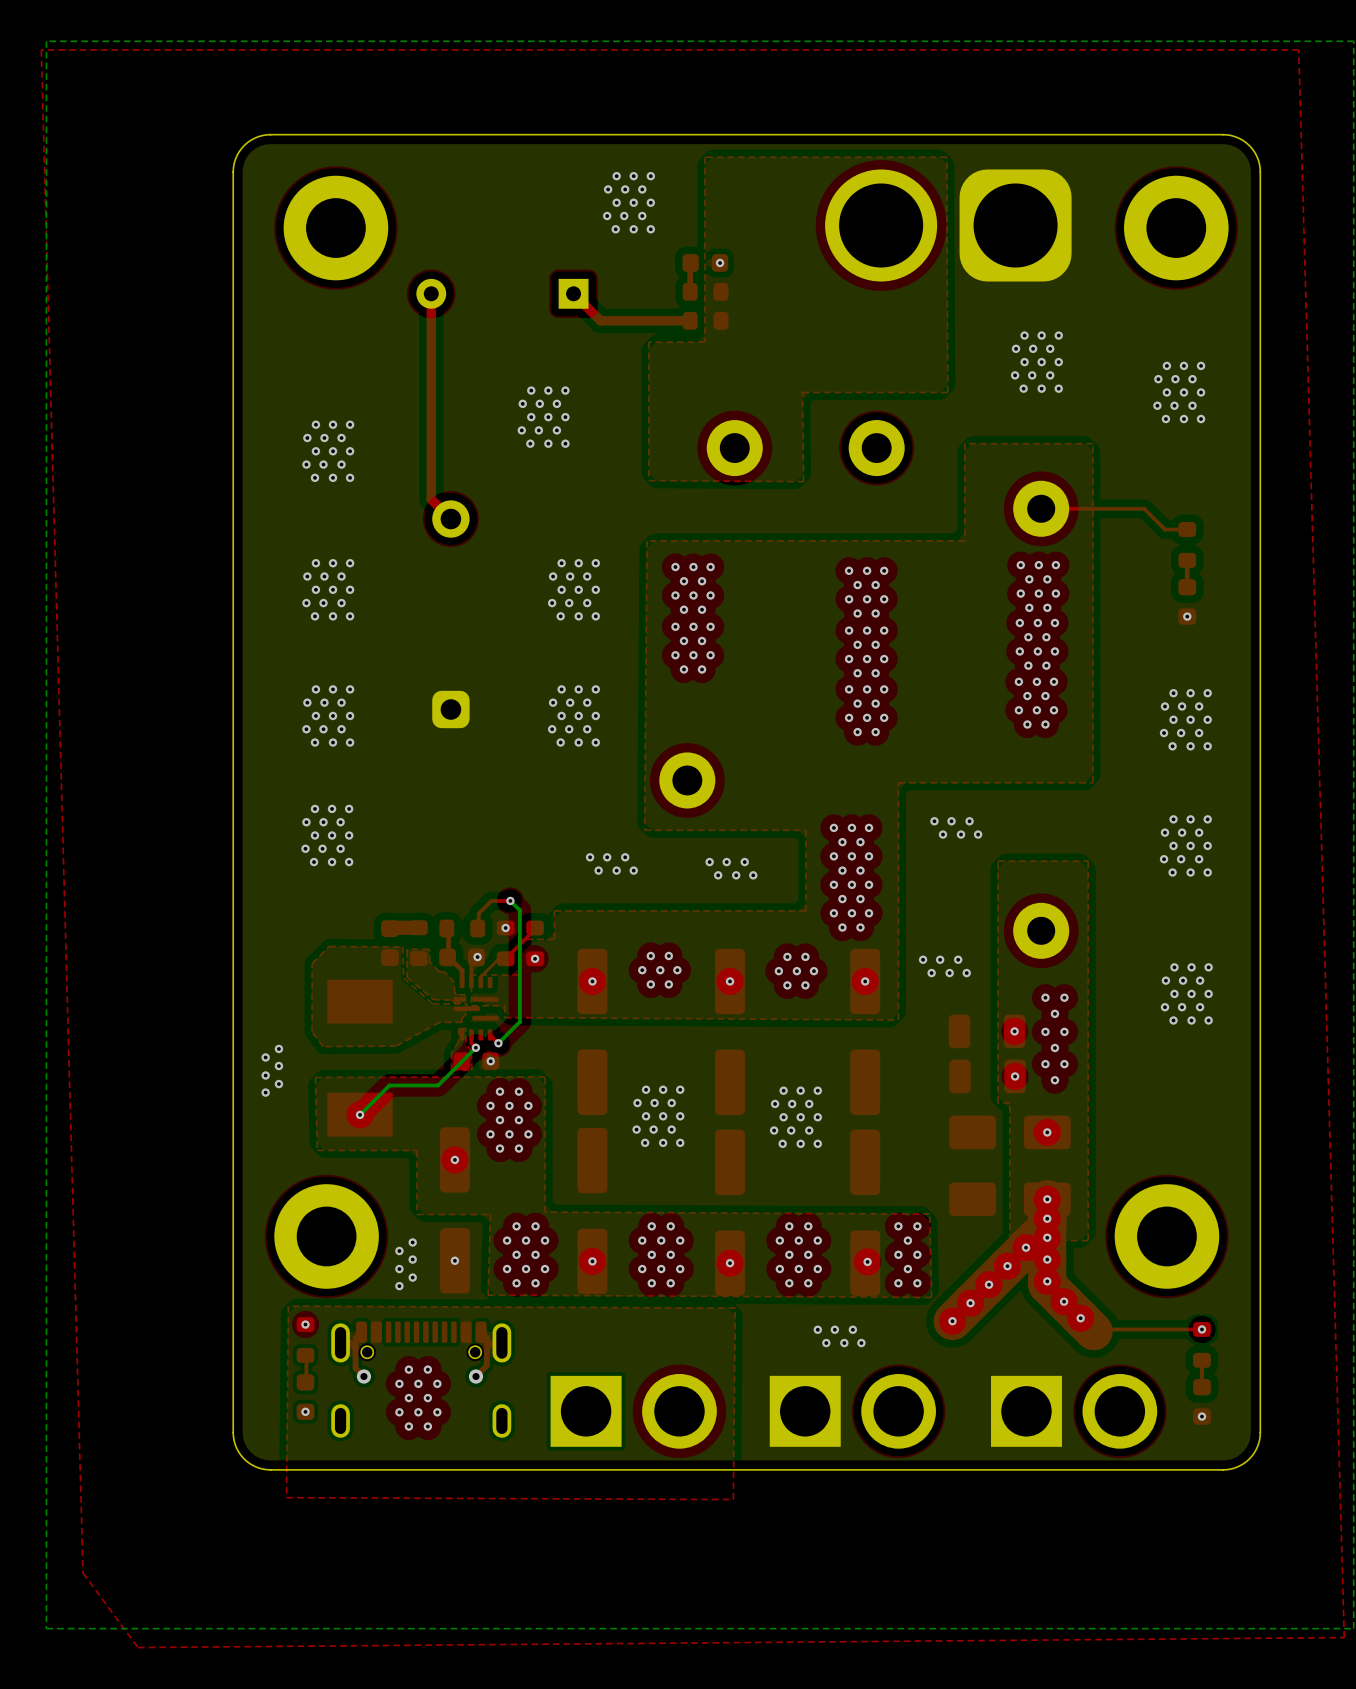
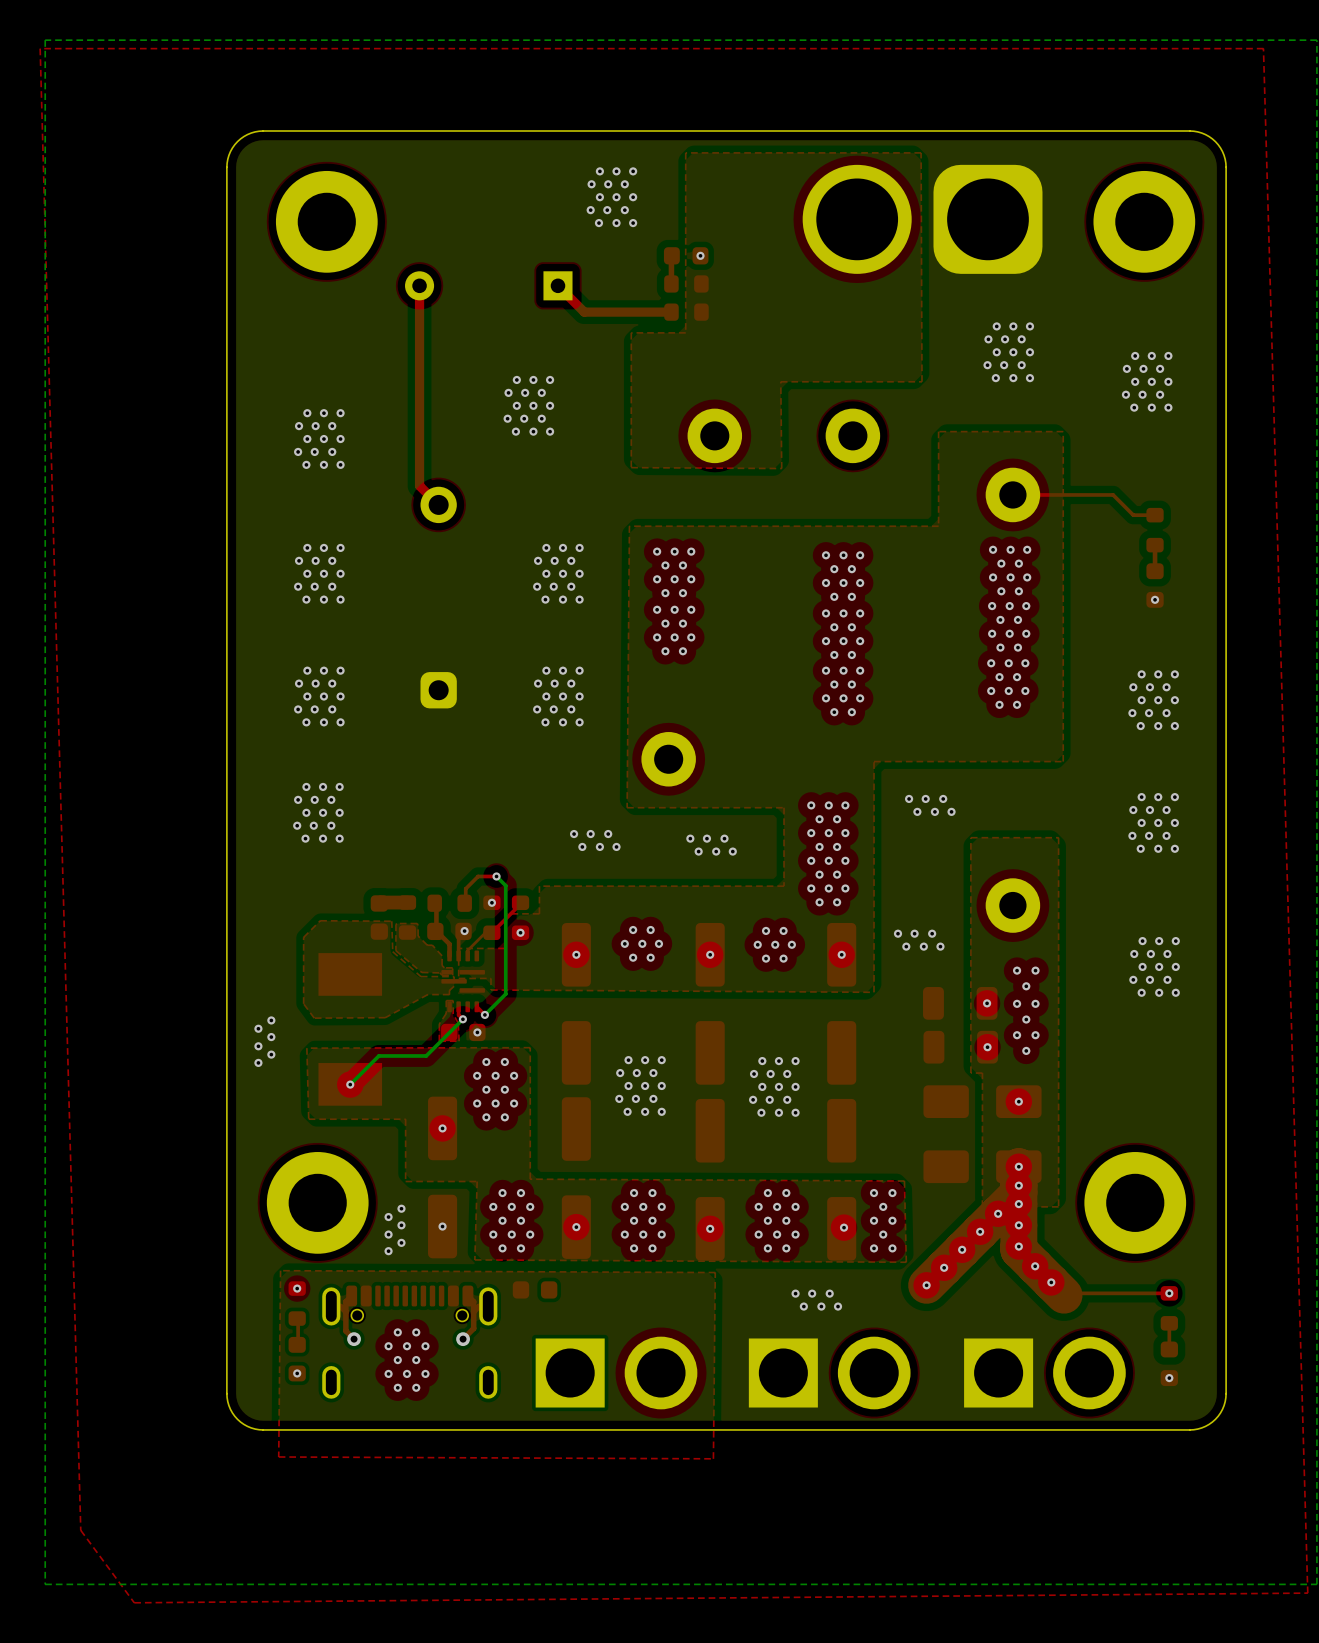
part: none -> (535, 1289)

